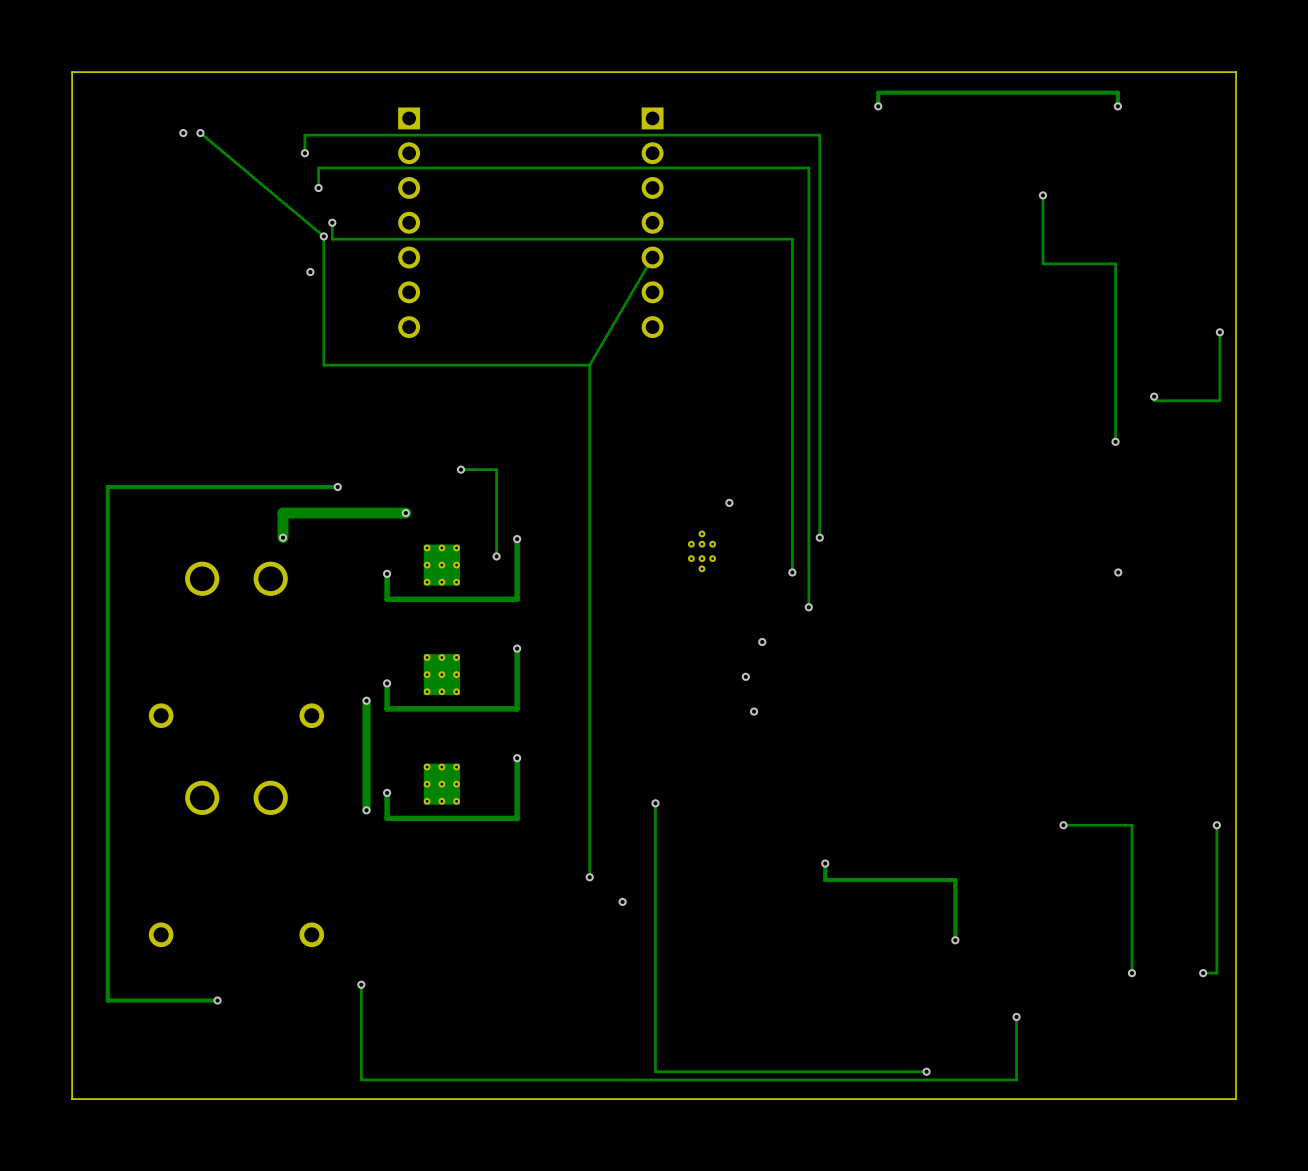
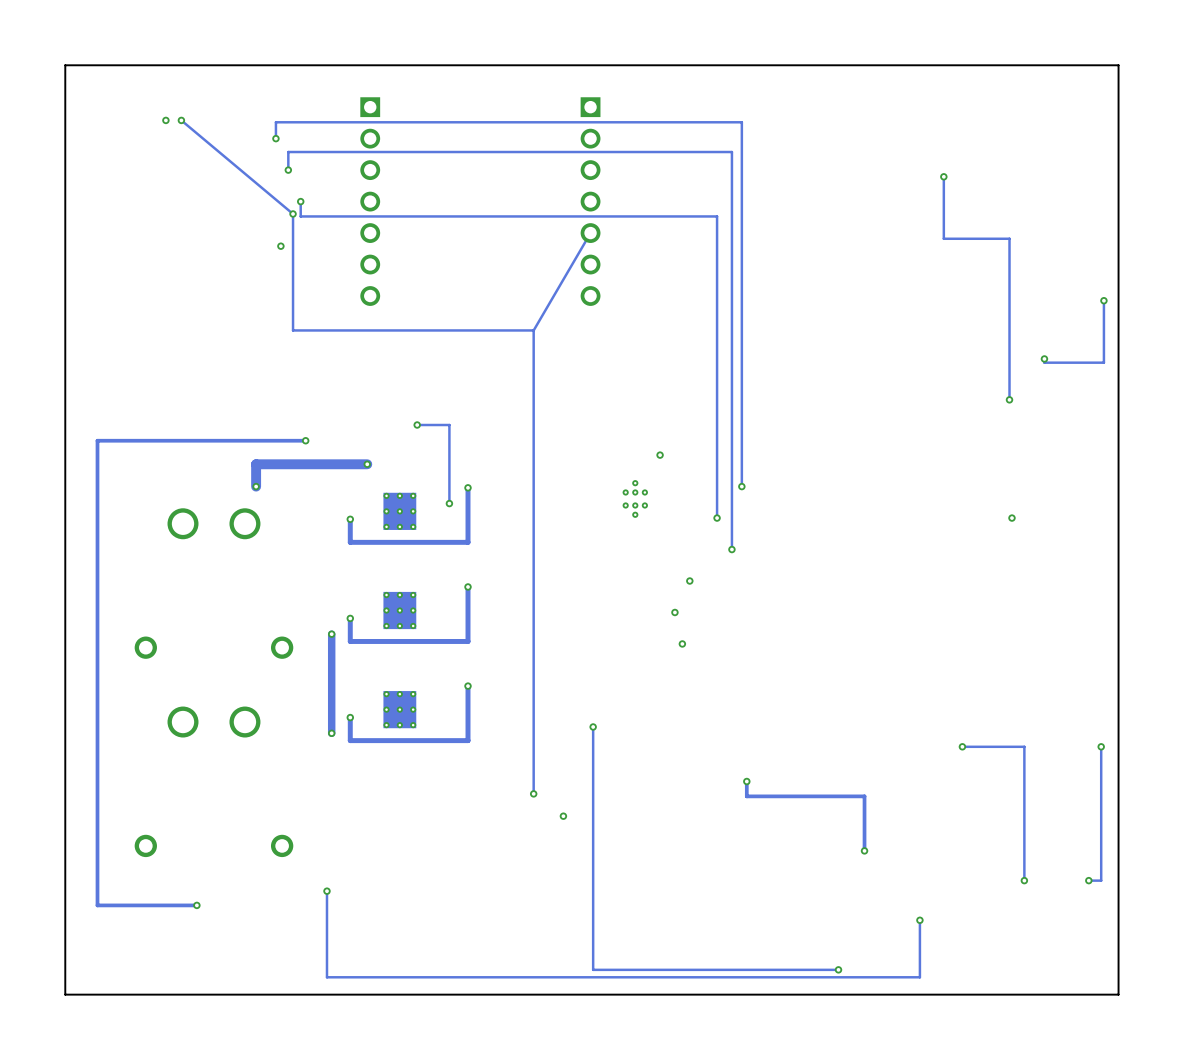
via: (878, 106) -> none
track: (1117, 106) (1117, 92) (878, 92) (878, 106) -> none
via: (1117, 106) -> none

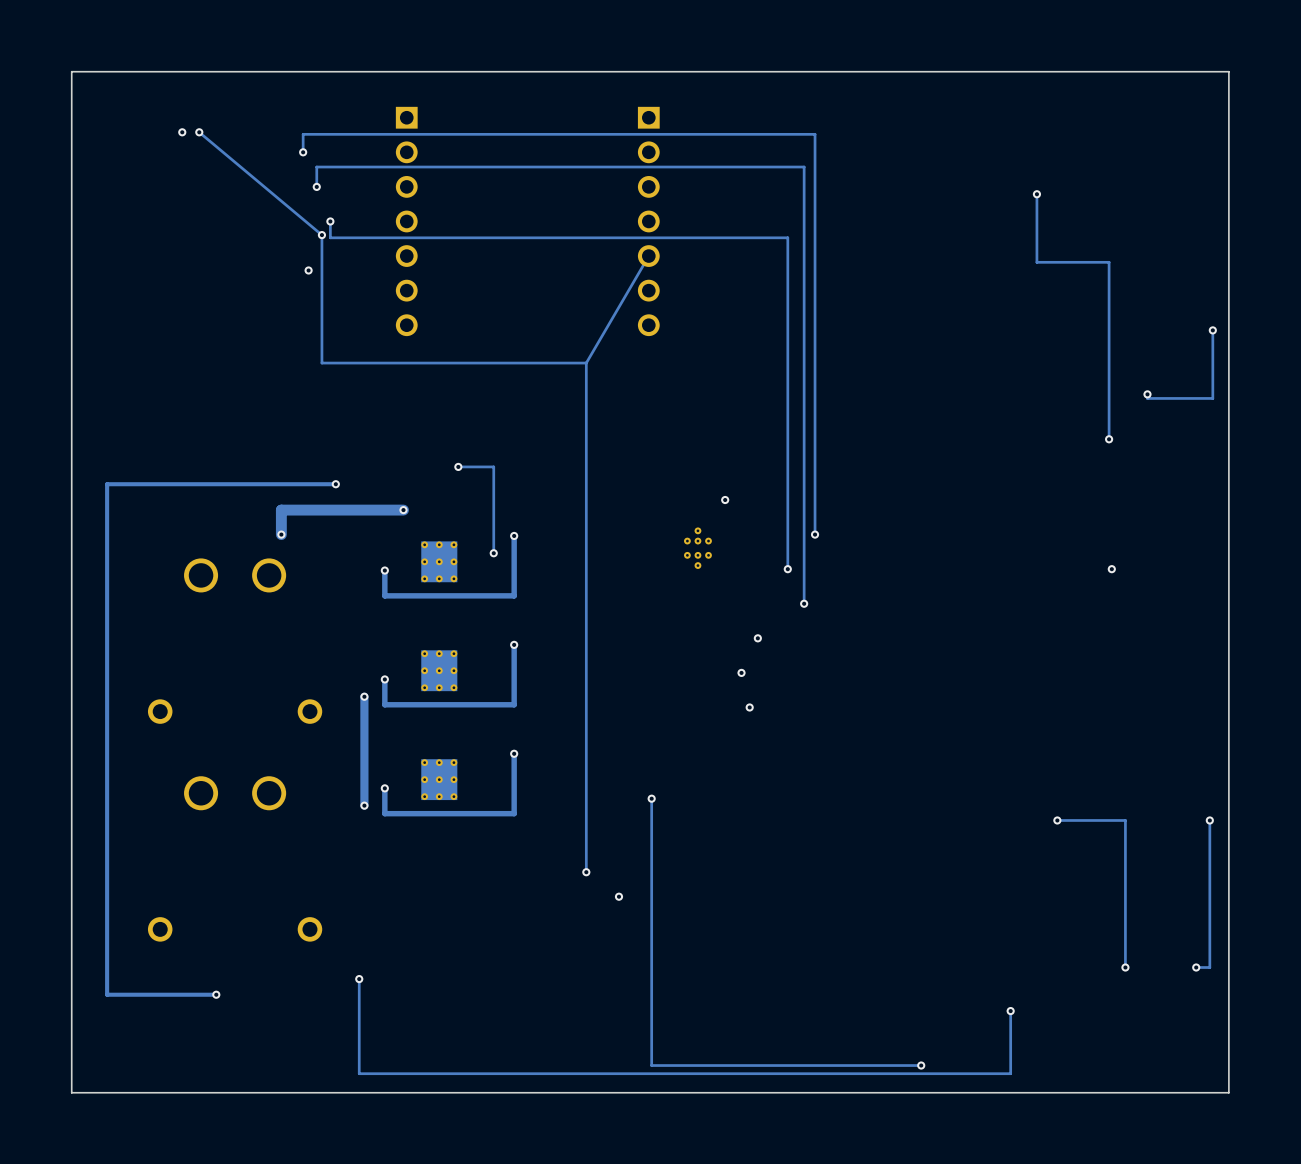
track: (746, 781) (746, 796) (864, 796) (864, 850) -> none
via: (746, 781) -> none
via: (864, 850) -> none

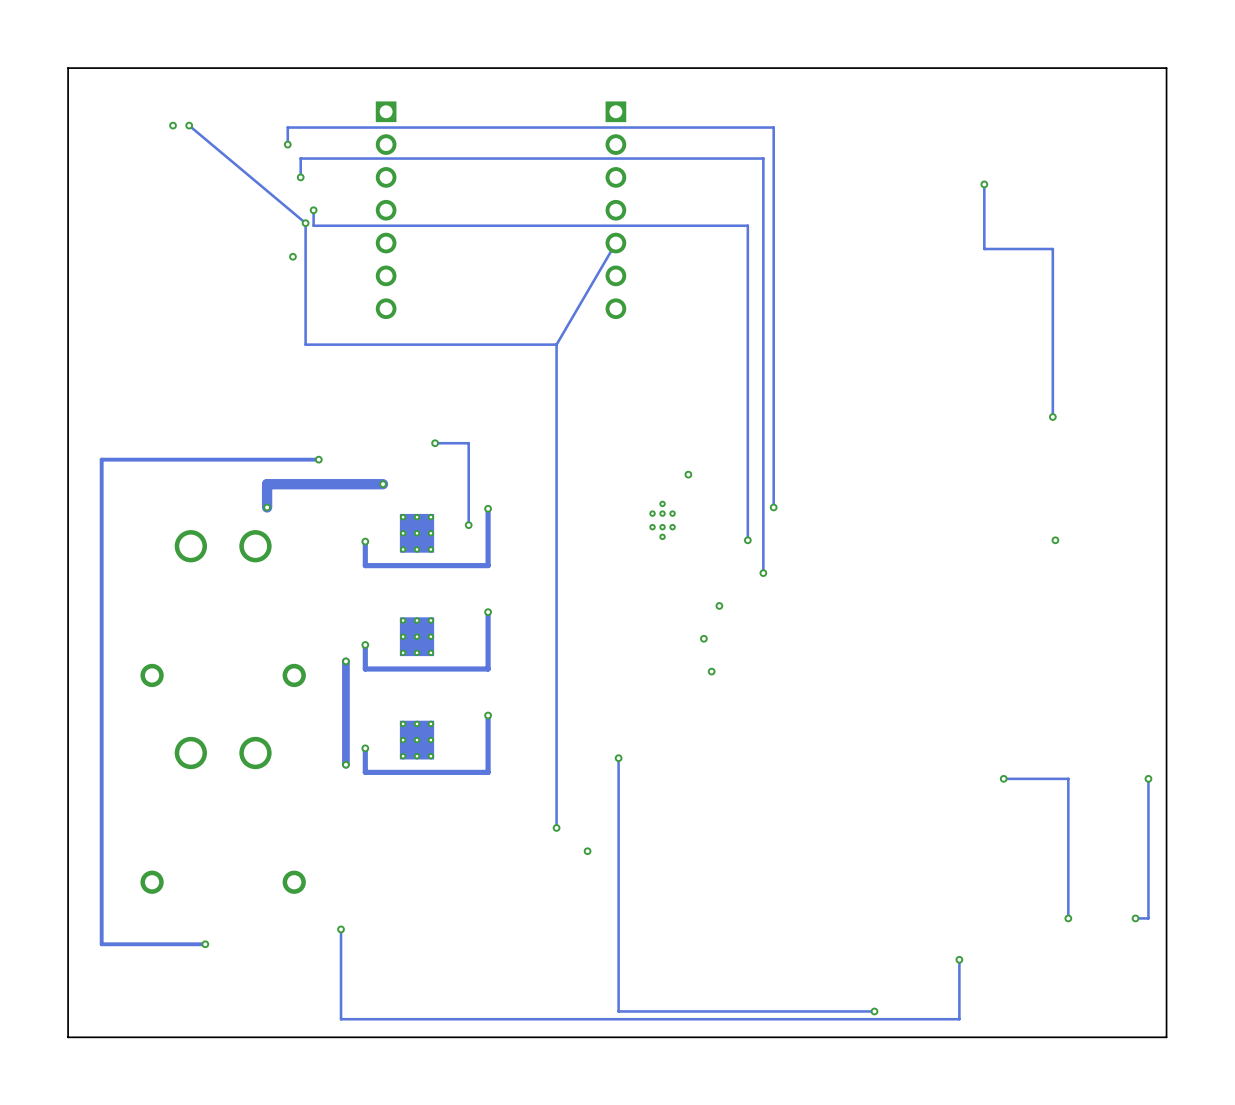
track: (1212, 330) (1212, 398) (1147, 398) (1147, 394) -> none
via: (1212, 330) -> none
via: (1147, 394) -> none

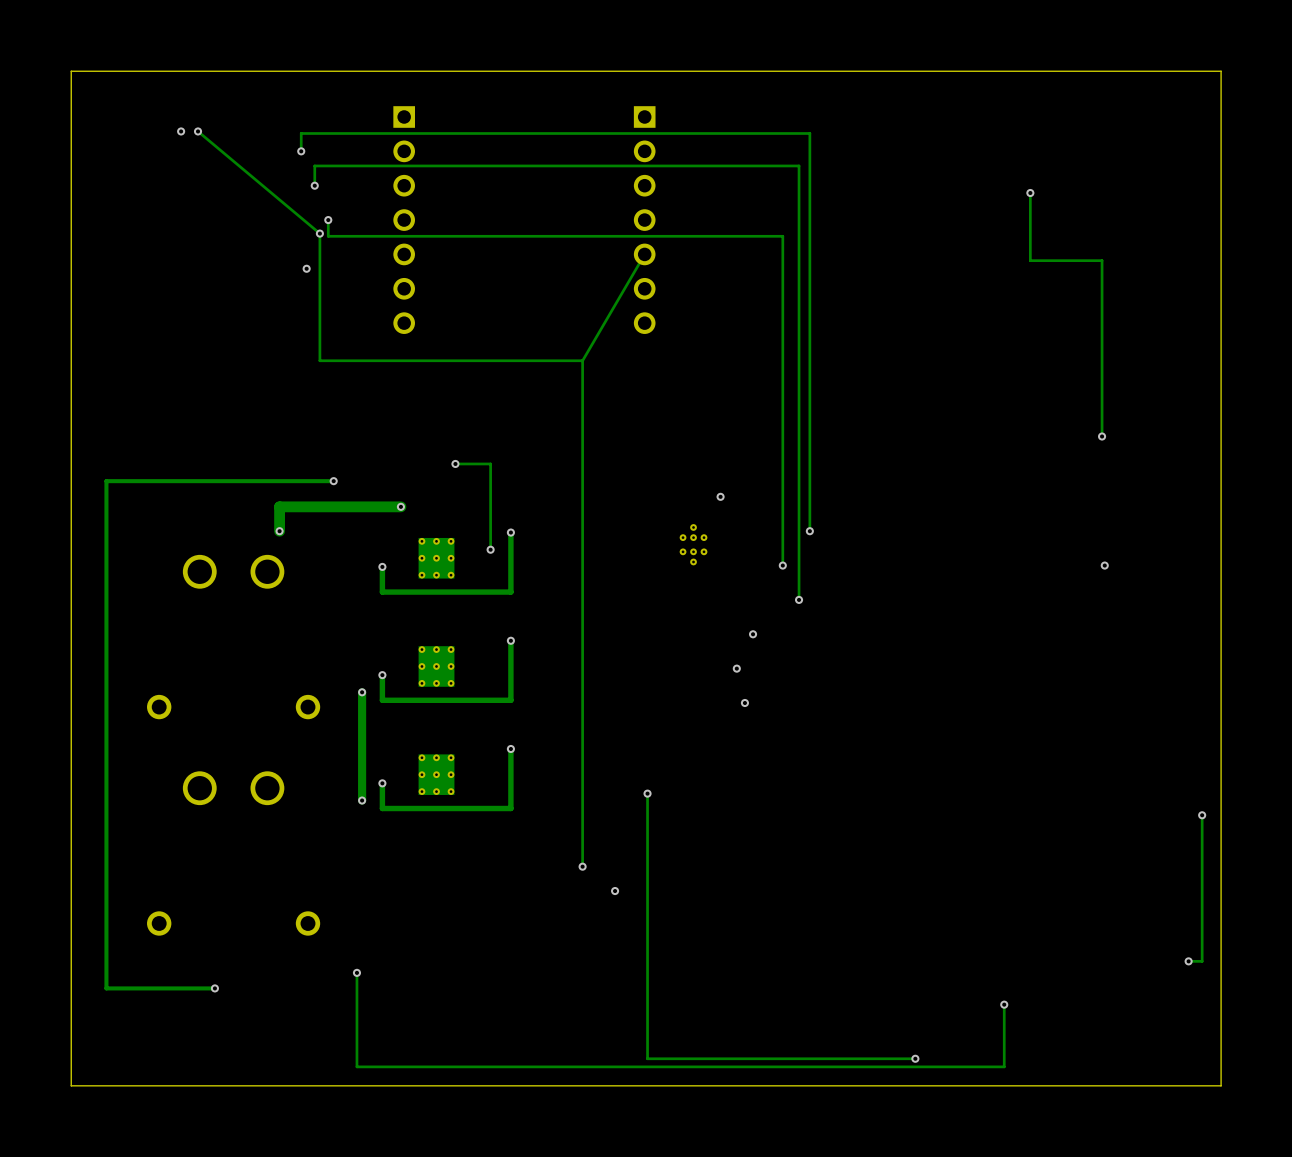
track: (1003, 778) (1068, 778) (1068, 918) -> none
via: (1003, 778) -> none
via: (1068, 918) -> none

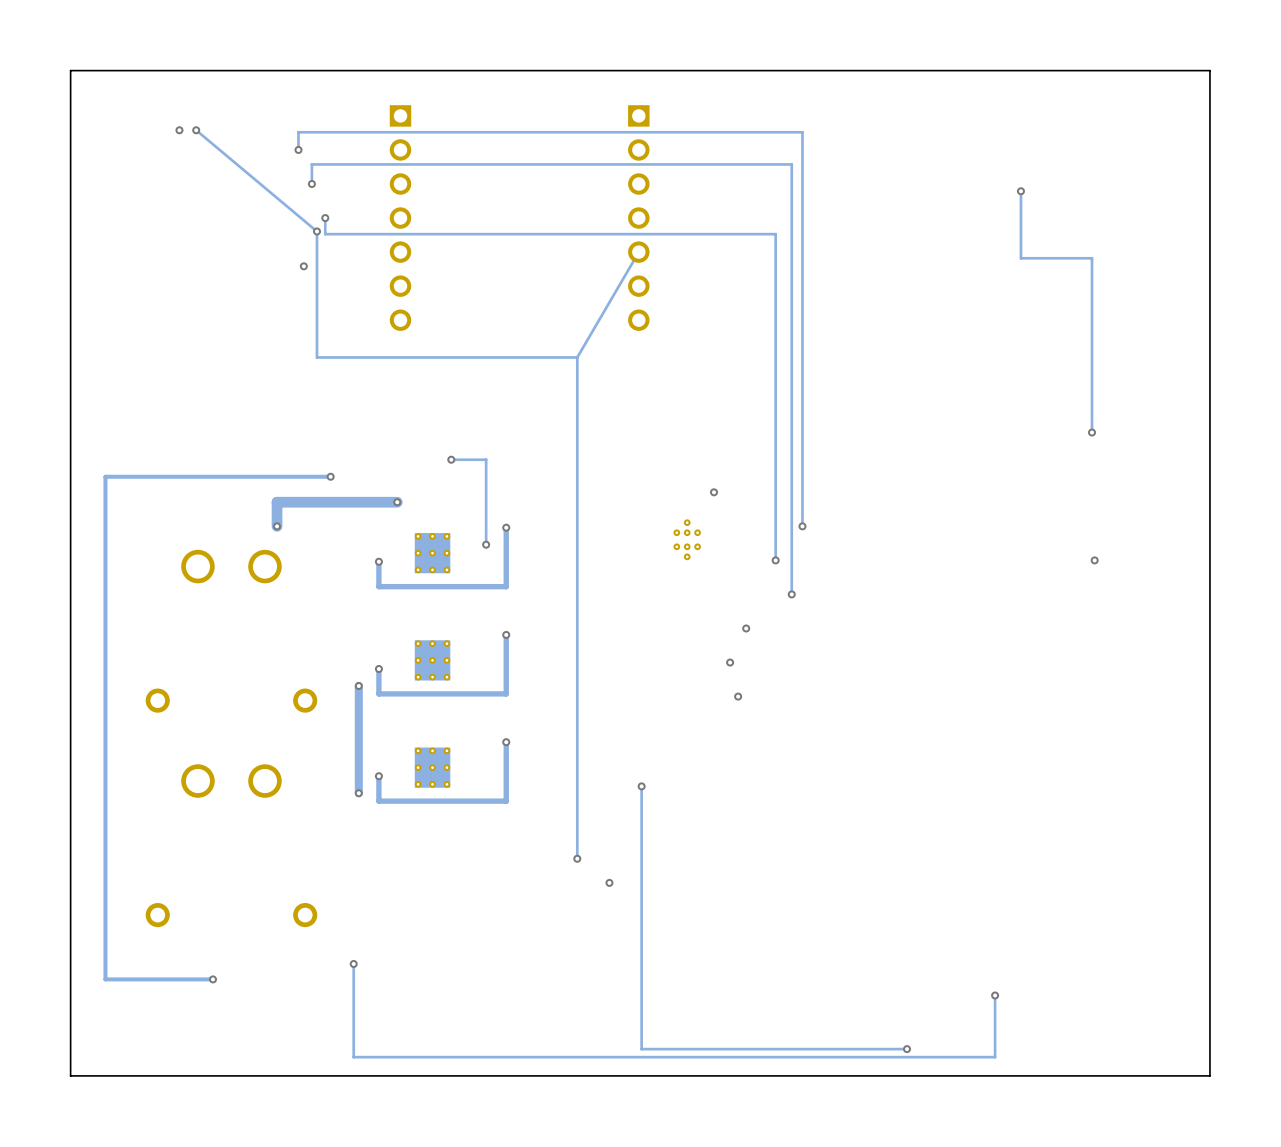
track: (1202, 815) (1202, 961) (1188, 961) -> none
via: (1202, 815) -> none
via: (1188, 961) -> none

